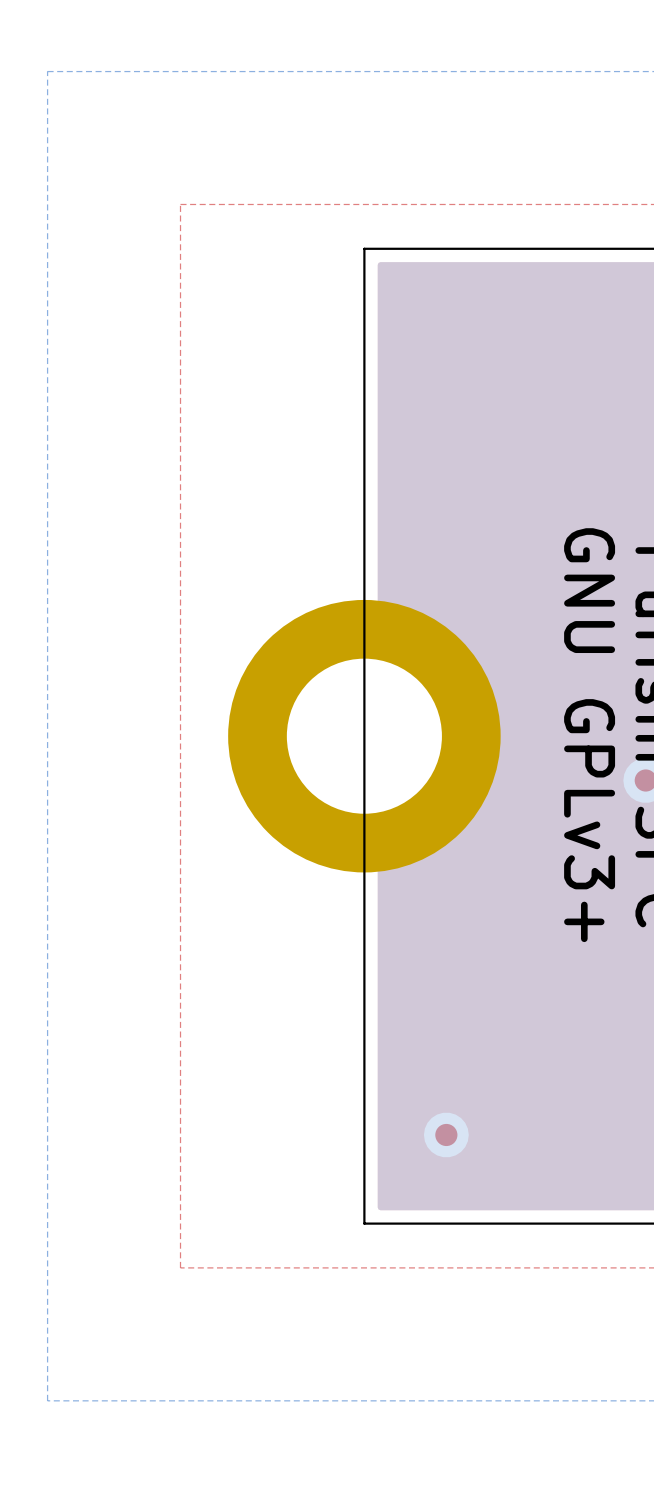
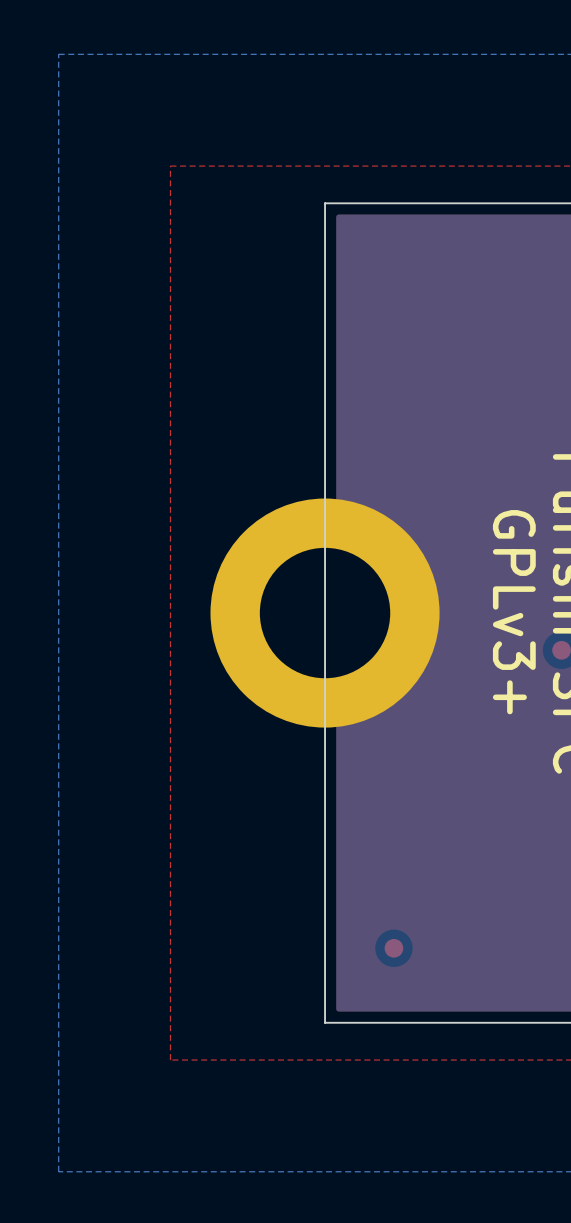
text: GNU GPLv3+ (589, 735) -> GPLv3+ (514, 612)

